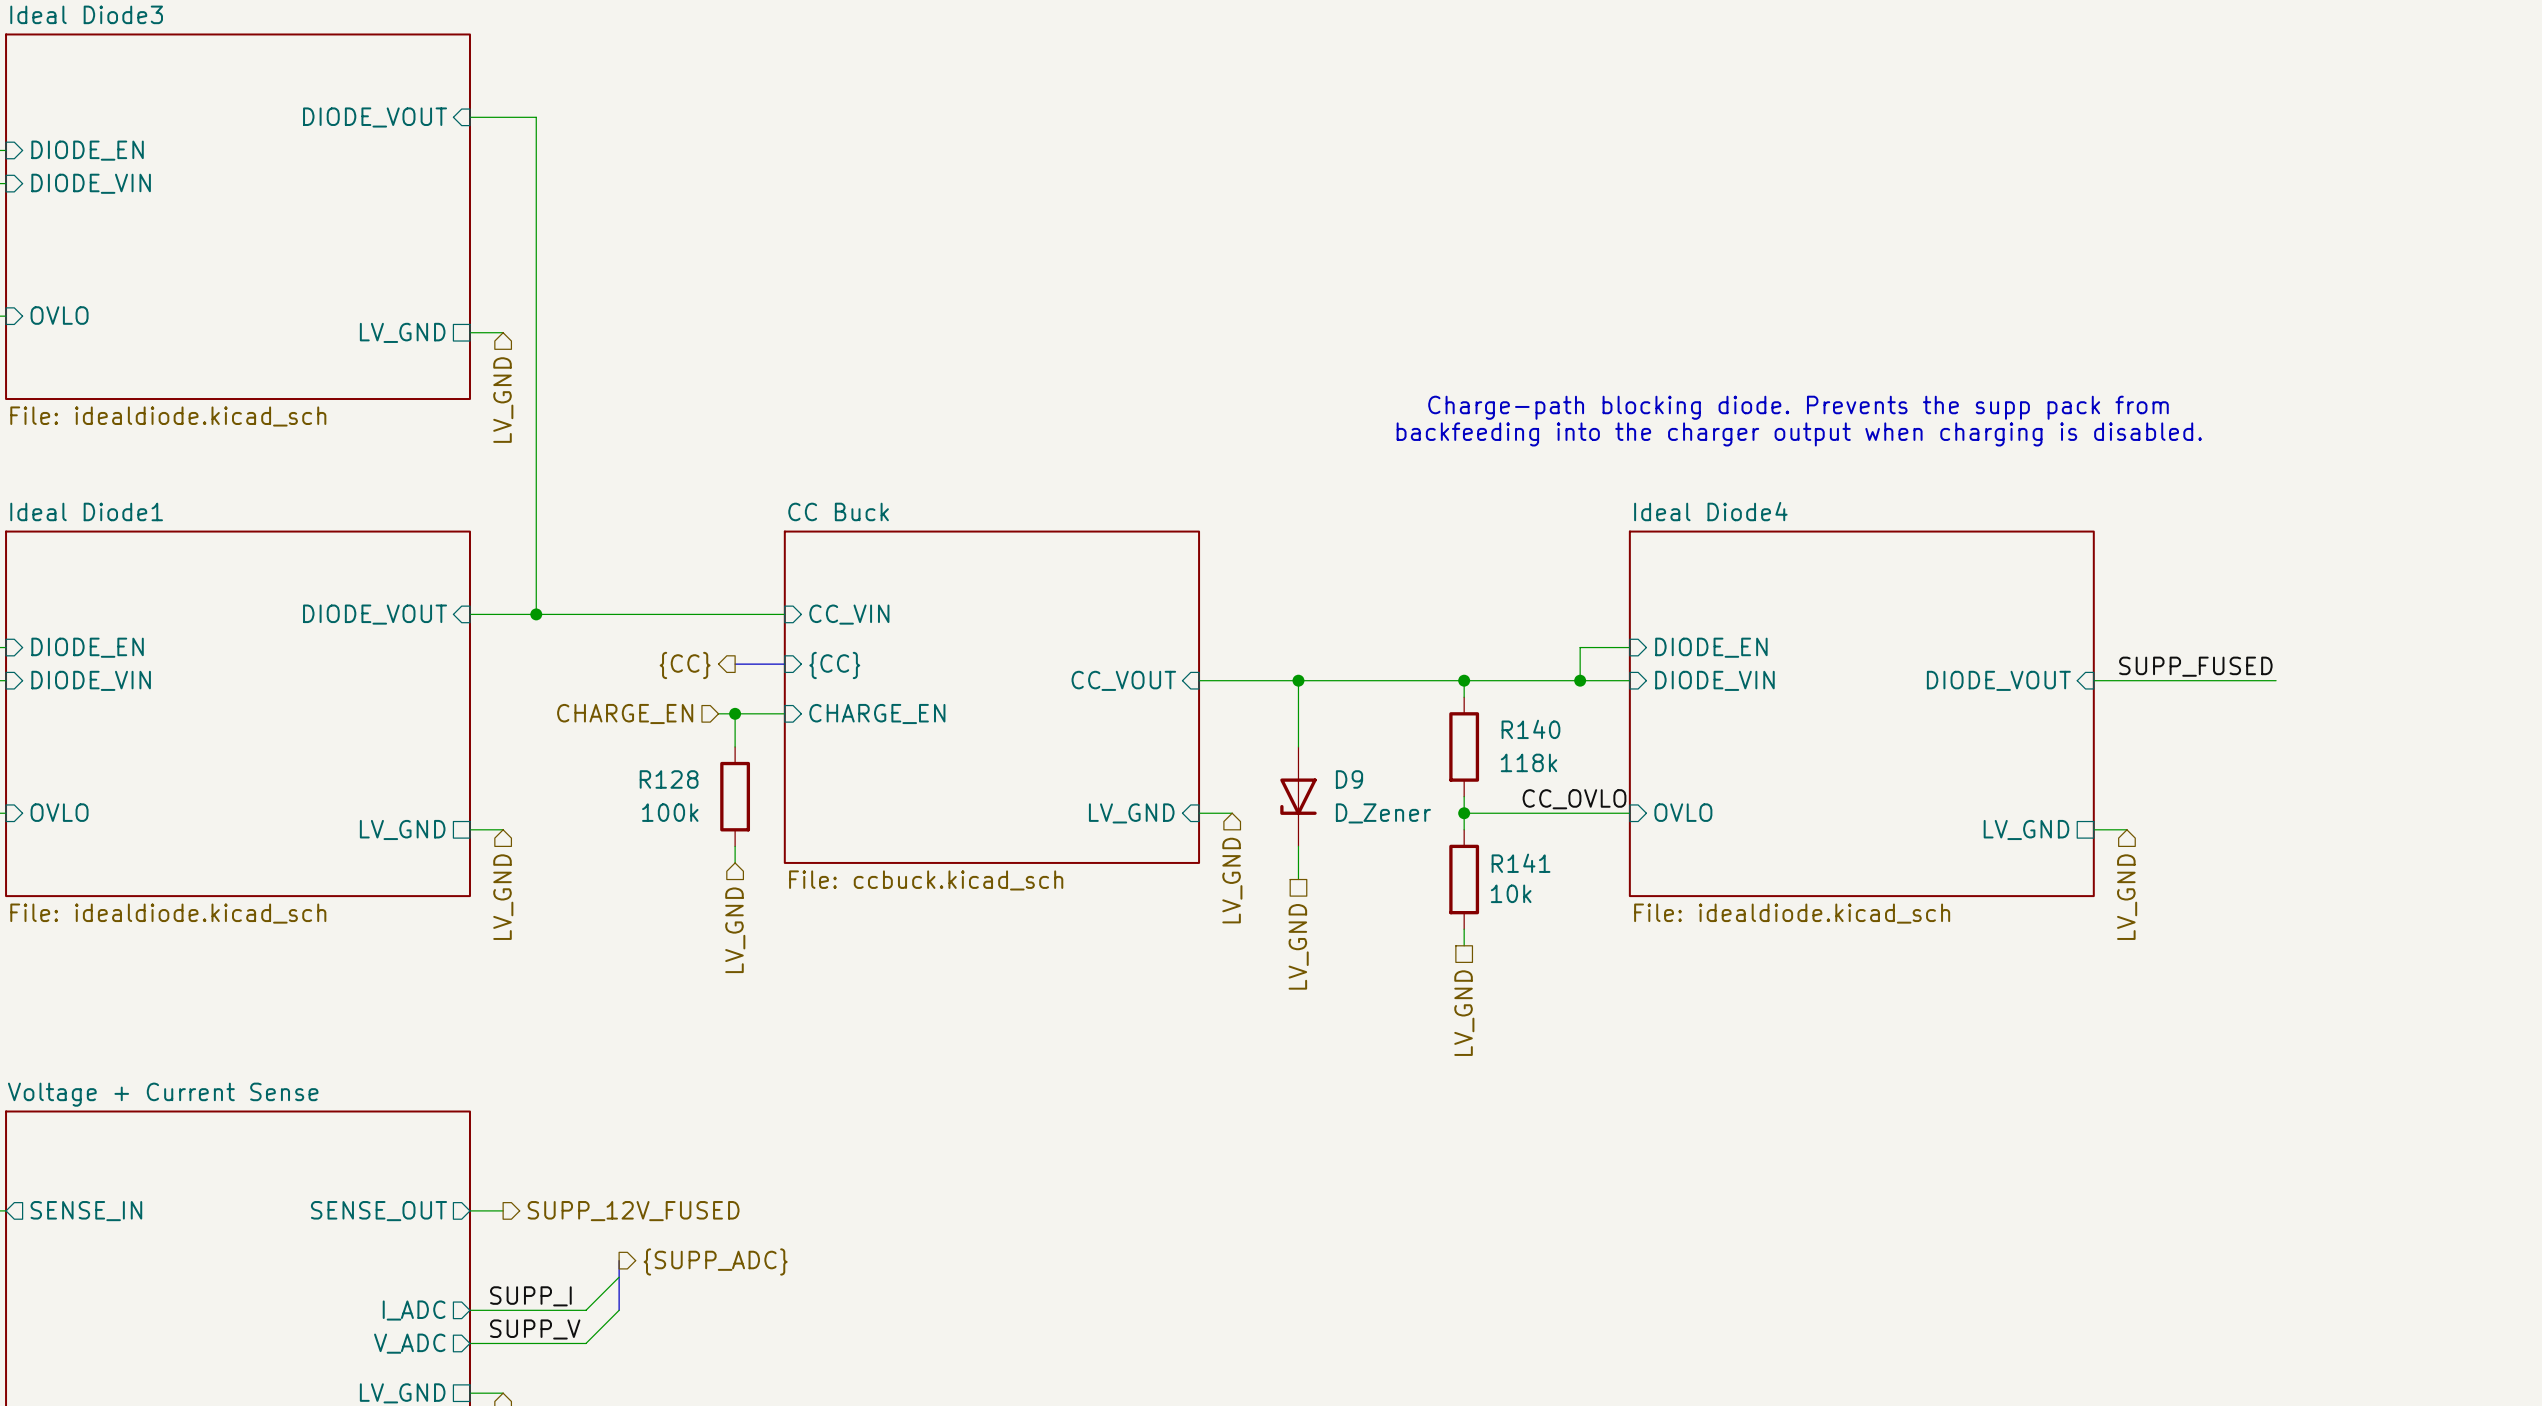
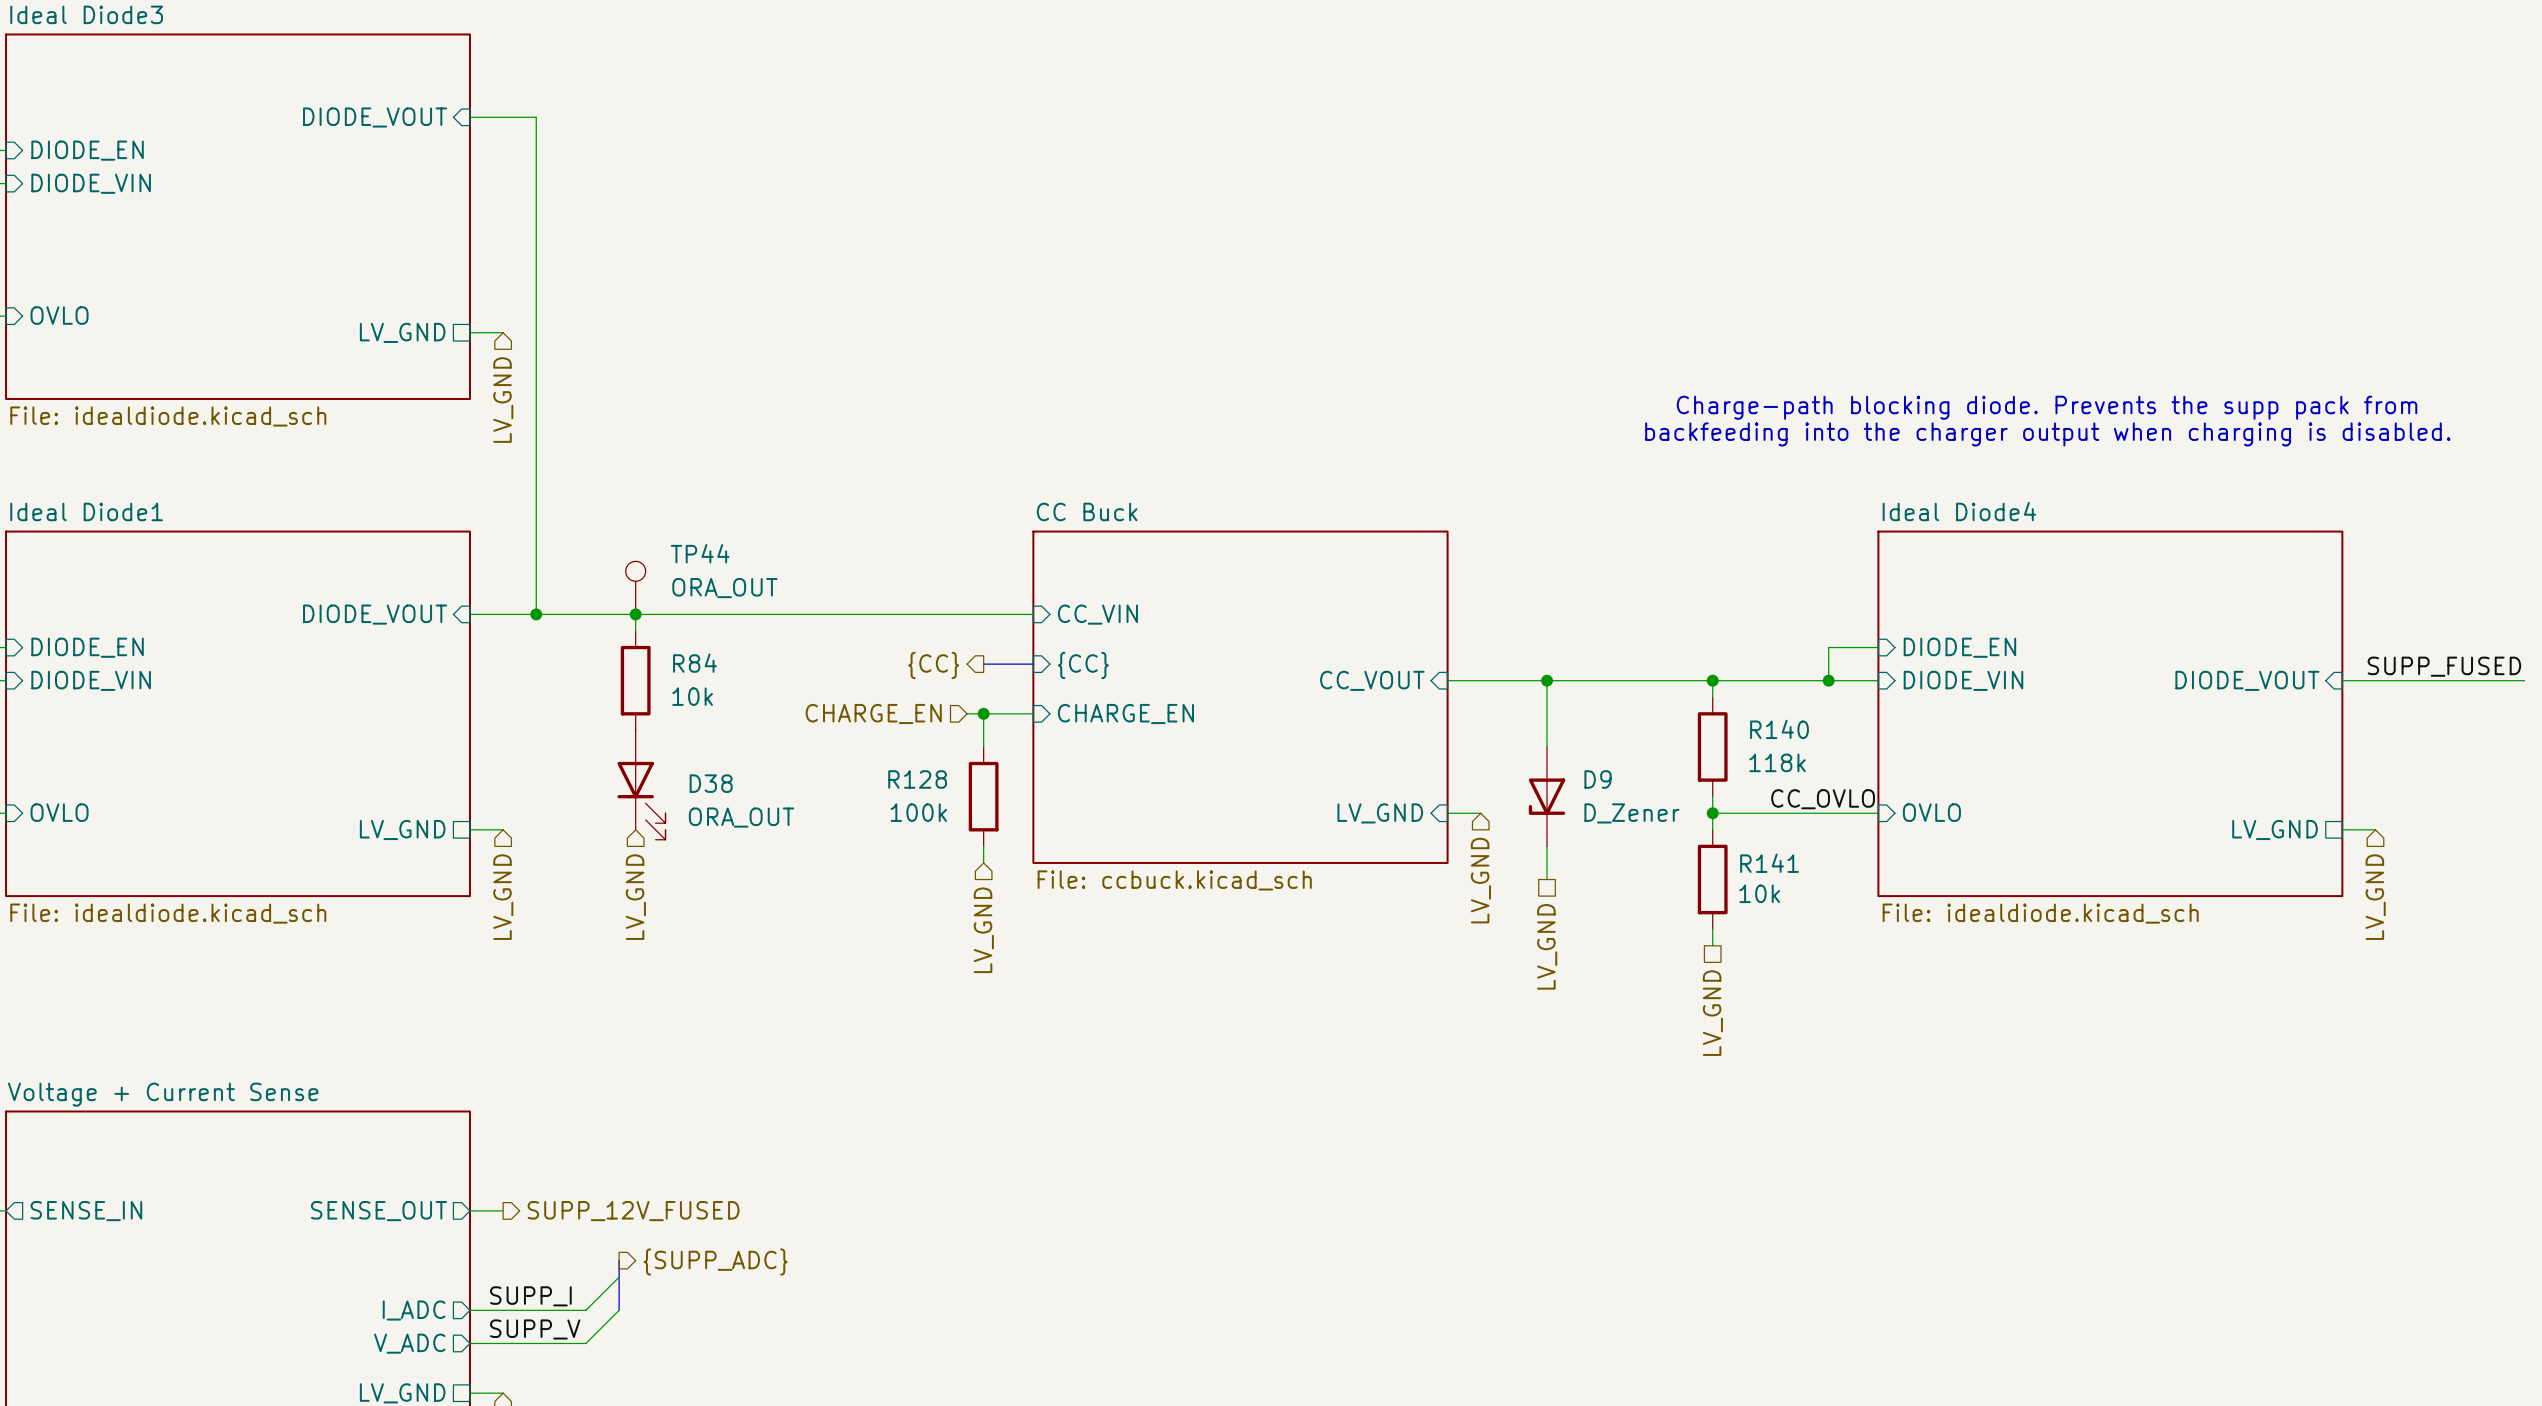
text position: Charge-path blocking diode. Prevents the supp pack from (1798, 407) -> Charge-path blocking diode. Prevents the supp pack from (2047, 407)
text position: backfeeding into the charger output when charging is disabled. (1799, 434) -> backfeeding into the charger output when charging is disabled. (2047, 434)
TP44: none -> ORA_OUT (635, 587)
wire: none -> (635, 614) (635, 630)
junction: none -> (635, 614)
wire: none -> (784, 614) (1033, 614)
sheet pin position: CC_VIN (849, 614) -> CC_VIN (1097, 614)
wire: (1629, 647) (1580, 647) (1580, 680) -> (1878, 647) (1828, 647) (1828, 680)
sheet pin position: DIODE_EN (1711, 647) -> DIODE_EN (1959, 647)
bus: (735, 664) (784, 664) -> (983, 664) (1033, 664)
hierarchical label position: {CC} (685, 665) -> {CC} (933, 665)
sheet pin position: {CC} (834, 665) -> {CC} (1083, 665)
label position: SUPP_FUSED (2195, 666) -> SUPP_FUSED (2444, 666)
R84: none -> 10k (635, 680)
sheet pin position: CC_VOUT (1123, 680) -> CC_VOUT (1372, 680)
wire: (1199, 680) (1447, 680) -> none
wire: (1298, 680) (1298, 746) -> (1547, 680) (1547, 746)
junction: (1298, 680) -> none
wire: (1464, 680) (1464, 697) -> (1712, 680) (1712, 697)
junction: (1464, 680) -> none
junction position: (1580, 680) -> (1547, 680)
wire: none -> (1629, 680) (1878, 680)
junction: none -> (1712, 680)
sheet pin position: DIODE_VIN (1714, 680) -> DIODE_VIN (1963, 680)
junction: none -> (1828, 680)
sheet pin position: DIODE_VOUT (1998, 680) -> DIODE_VOUT (2247, 680)
wire: (2093, 680) (2276, 680) -> (2342, 680) (2524, 680)
sheet CC Buck position: (991, 697) -> (1240, 697)
hierarchical label position: CHARGE_EN (625, 713) -> CHARGE_EN (873, 713)
wire: (718, 713) (784, 713) -> (967, 713) (1033, 713)
wire: (735, 713) (735, 746) -> (983, 713) (983, 746)
junction: (735, 713) -> none
sheet pin position: CHARGE_EN (877, 713) -> CHARGE_EN (1125, 713)
junction: none -> (983, 713)
sheet Ideal Diode4 position: (1861, 713) -> (2110, 713)
R140 position: (1464, 746) -> (1712, 746)
D38: none -> ORA_OUT (641, 785)
R128 position: (735, 796) -> (983, 796)
D9 position: (1298, 796) -> (1547, 796)
wire: (1464, 796) (1464, 829) -> (1712, 796) (1712, 829)
label position: CC_OVLO (1574, 799) -> CC_OVLO (1823, 799)
sheet pin position: OVLO (1683, 812) -> OVLO (1931, 812)
sheet pin position: LV_GND (1131, 813) -> LV_GND (1380, 813)
wire: (1199, 813) (1232, 813) -> none
wire: none -> (1447, 813) (1464, 813)
junction: (1464, 813) -> none
wire: (1480, 813) (1629, 813) -> none
wire: none -> (1712, 813) (1878, 813)
junction: none -> (1712, 813)
sheet pin position: LV_GND (2026, 829) -> LV_GND (2275, 829)
wire: (2093, 829) (2126, 829) -> (2342, 829) (2375, 829)
wire: (735, 846) (735, 862) -> (983, 846) (983, 862)
wire: (1298, 846) (1298, 879) -> (1547, 846) (1547, 879)
R141 position: (1464, 879) -> (1712, 879)
hierarchical label: LV_GND (1232, 880) -> none
hierarchical label: none -> LV_GND (1480, 880)
hierarchical label: LV_GND (2127, 897) -> none
hierarchical label: none -> LV_GND (2375, 897)
wire: (1464, 929) (1464, 945) -> (1712, 929) (1712, 945)
hierarchical label position: LV_GND (735, 930) -> LV_GND (635, 897)
hierarchical label: none -> LV_GND (983, 930)
hierarchical label: LV_GND (1298, 946) -> none
hierarchical label: none -> LV_GND (1547, 946)
hierarchical label: LV_GND (1464, 1013) -> none
hierarchical label: none -> LV_GND (1712, 1013)

